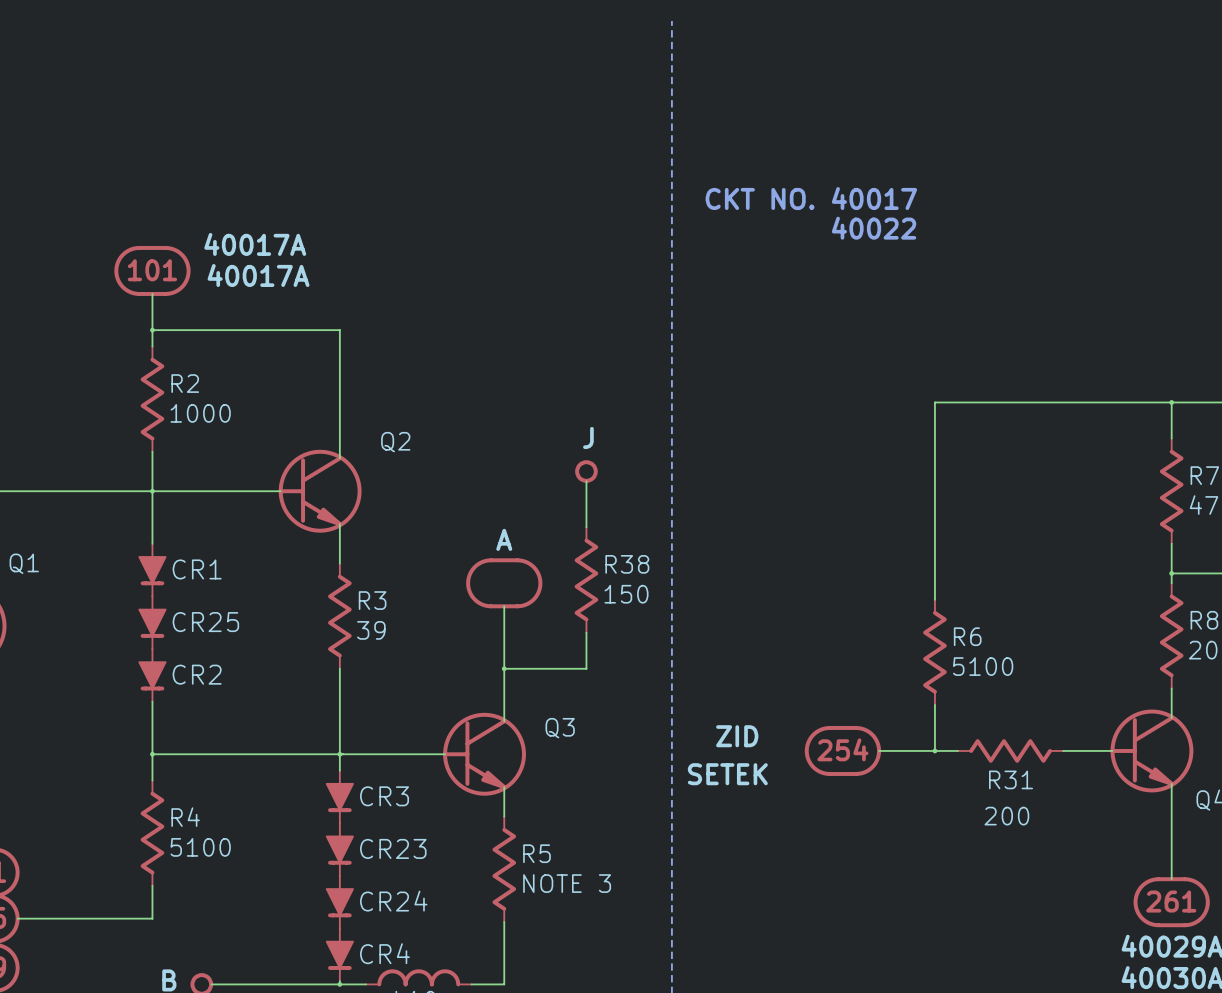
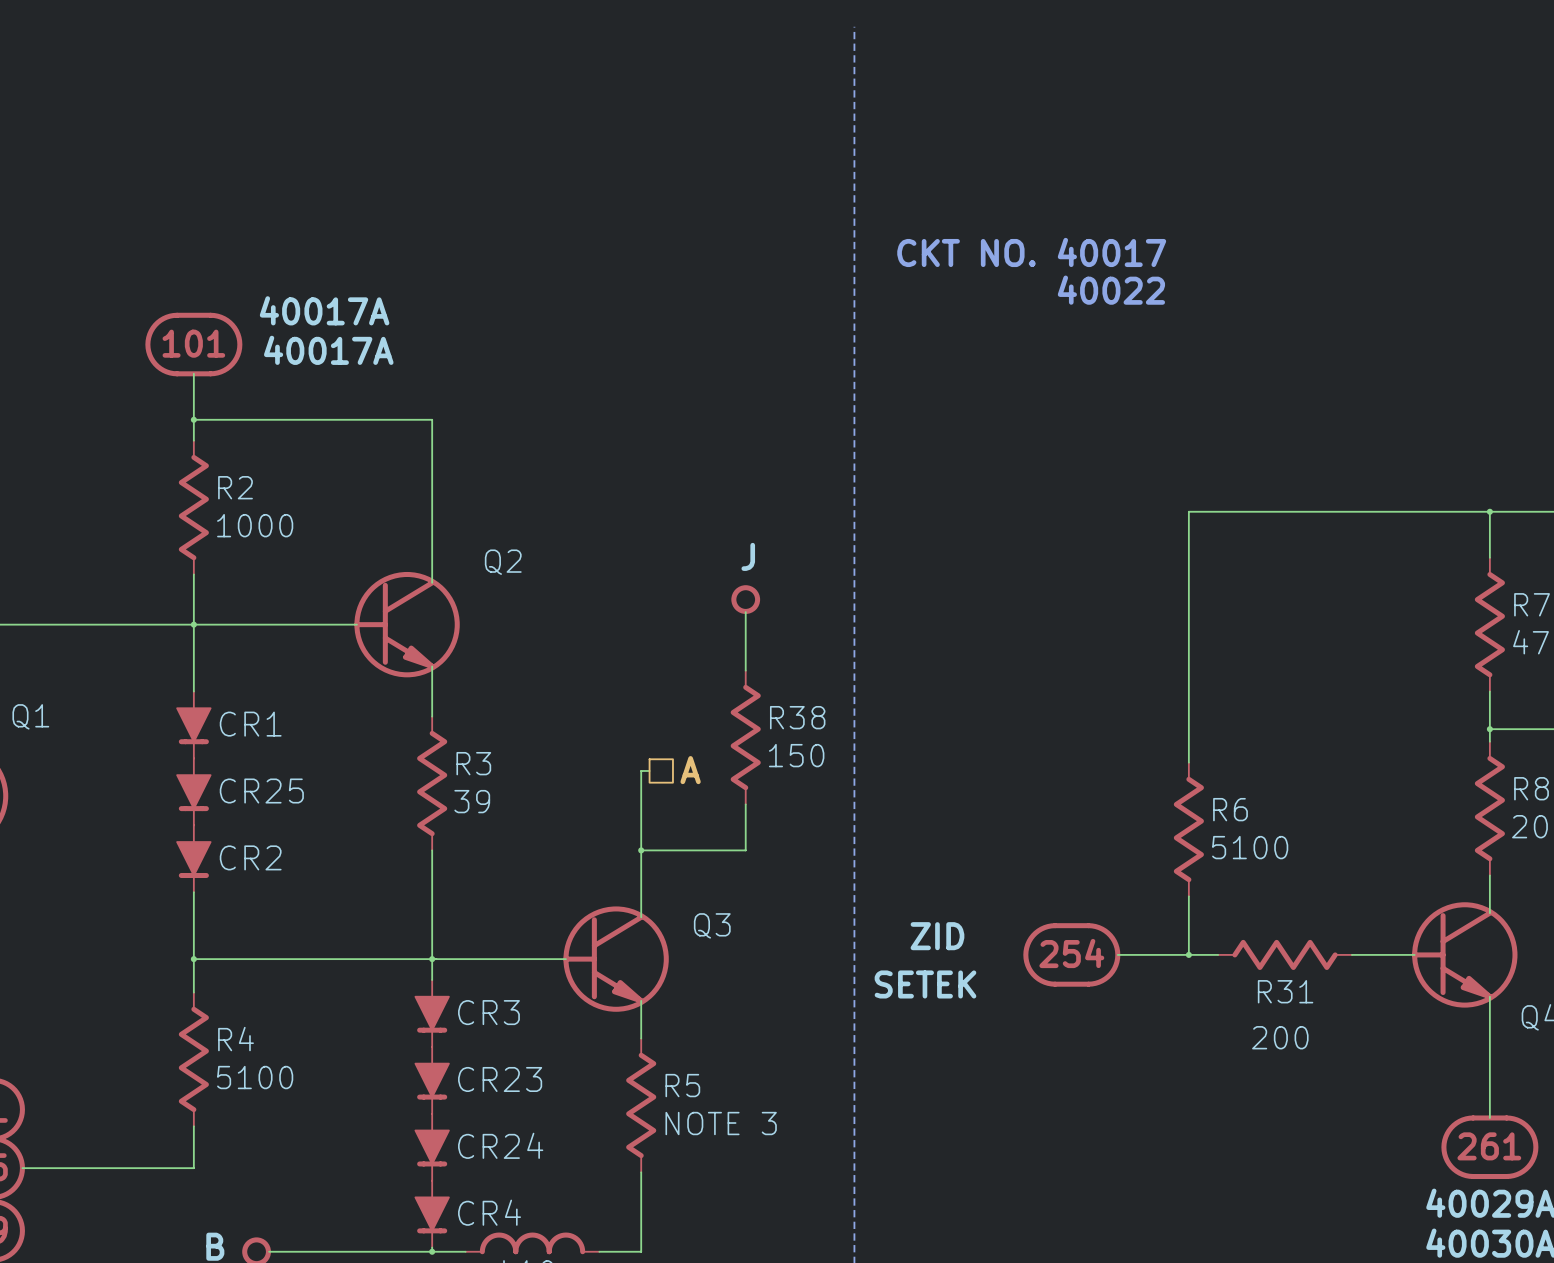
part: (504, 583) -> none
hierarchical label: none -> A (690, 770)

